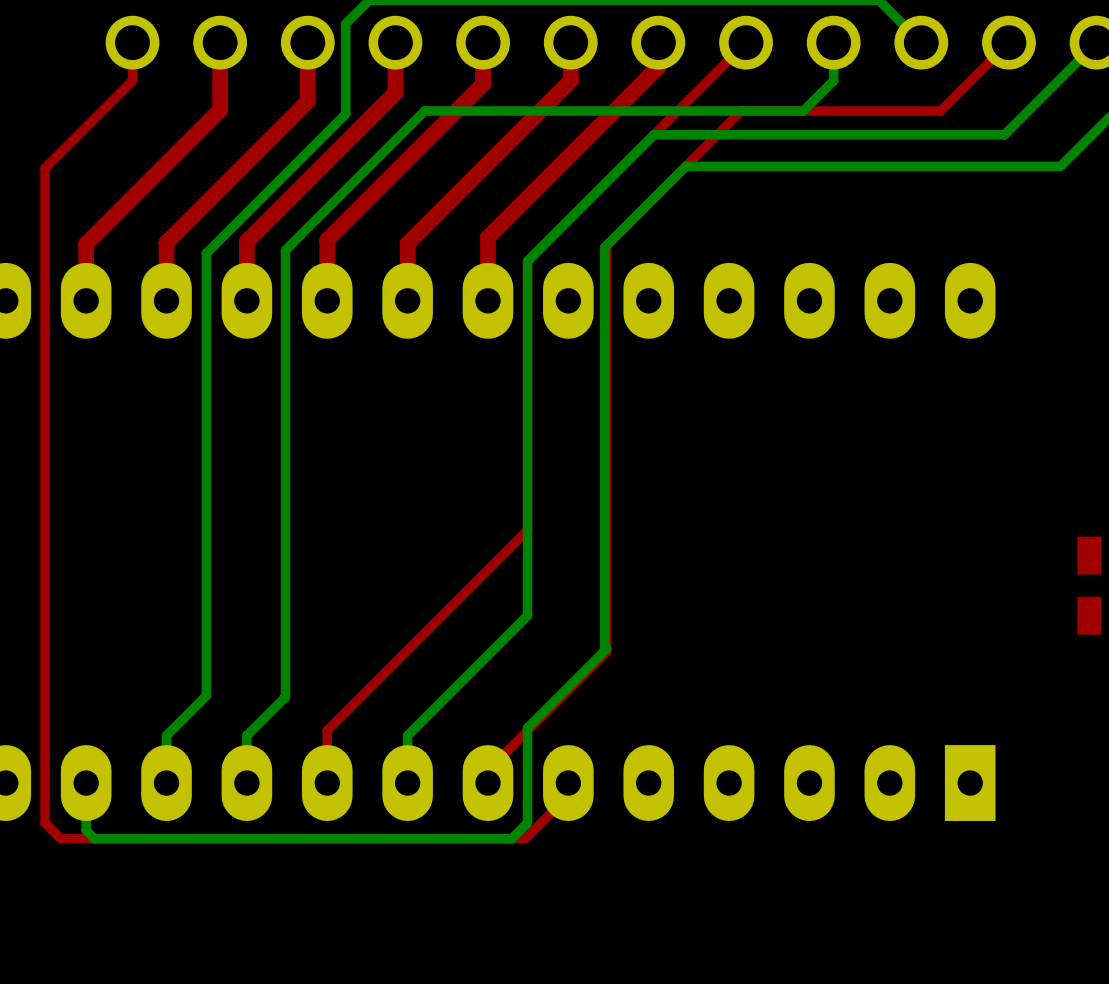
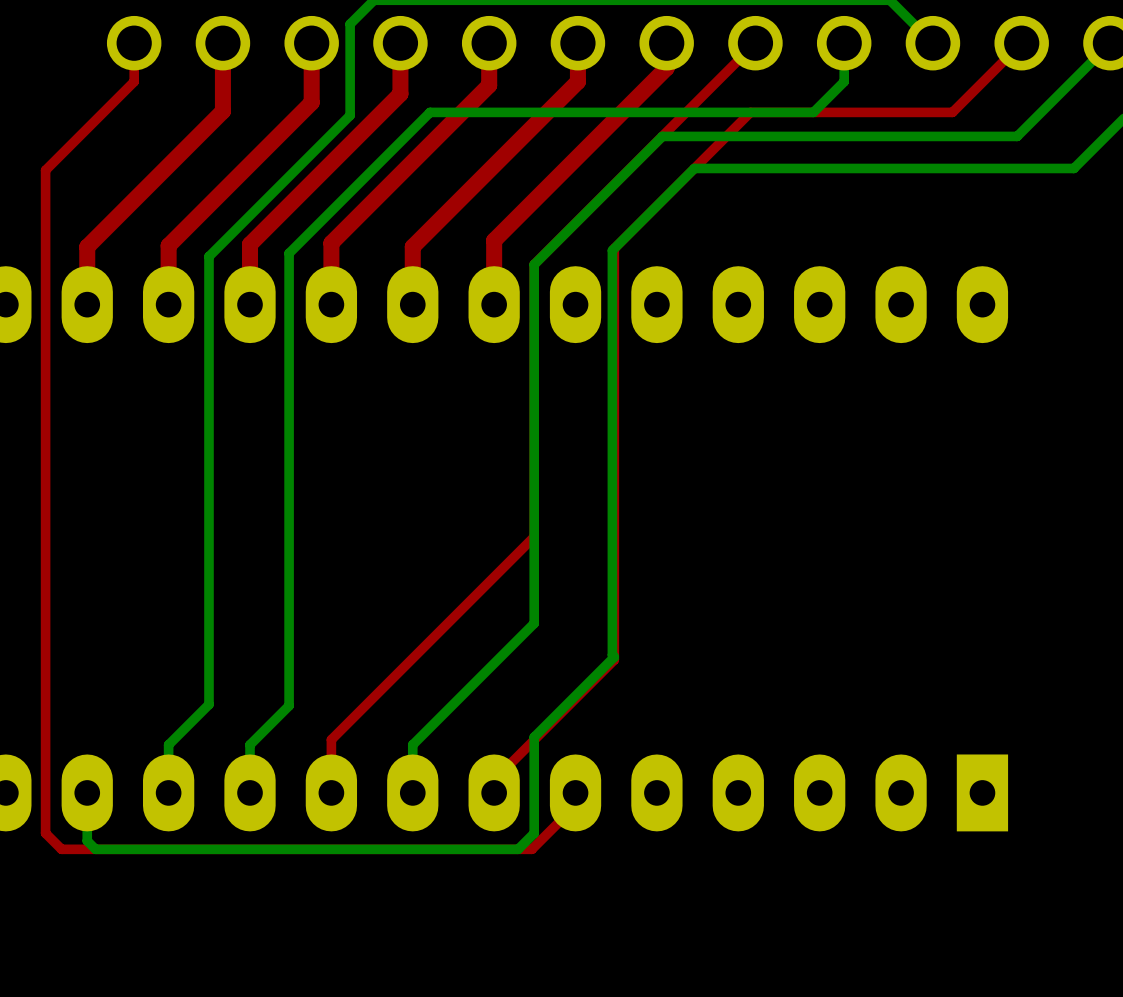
part: (1089, 585) -> none

